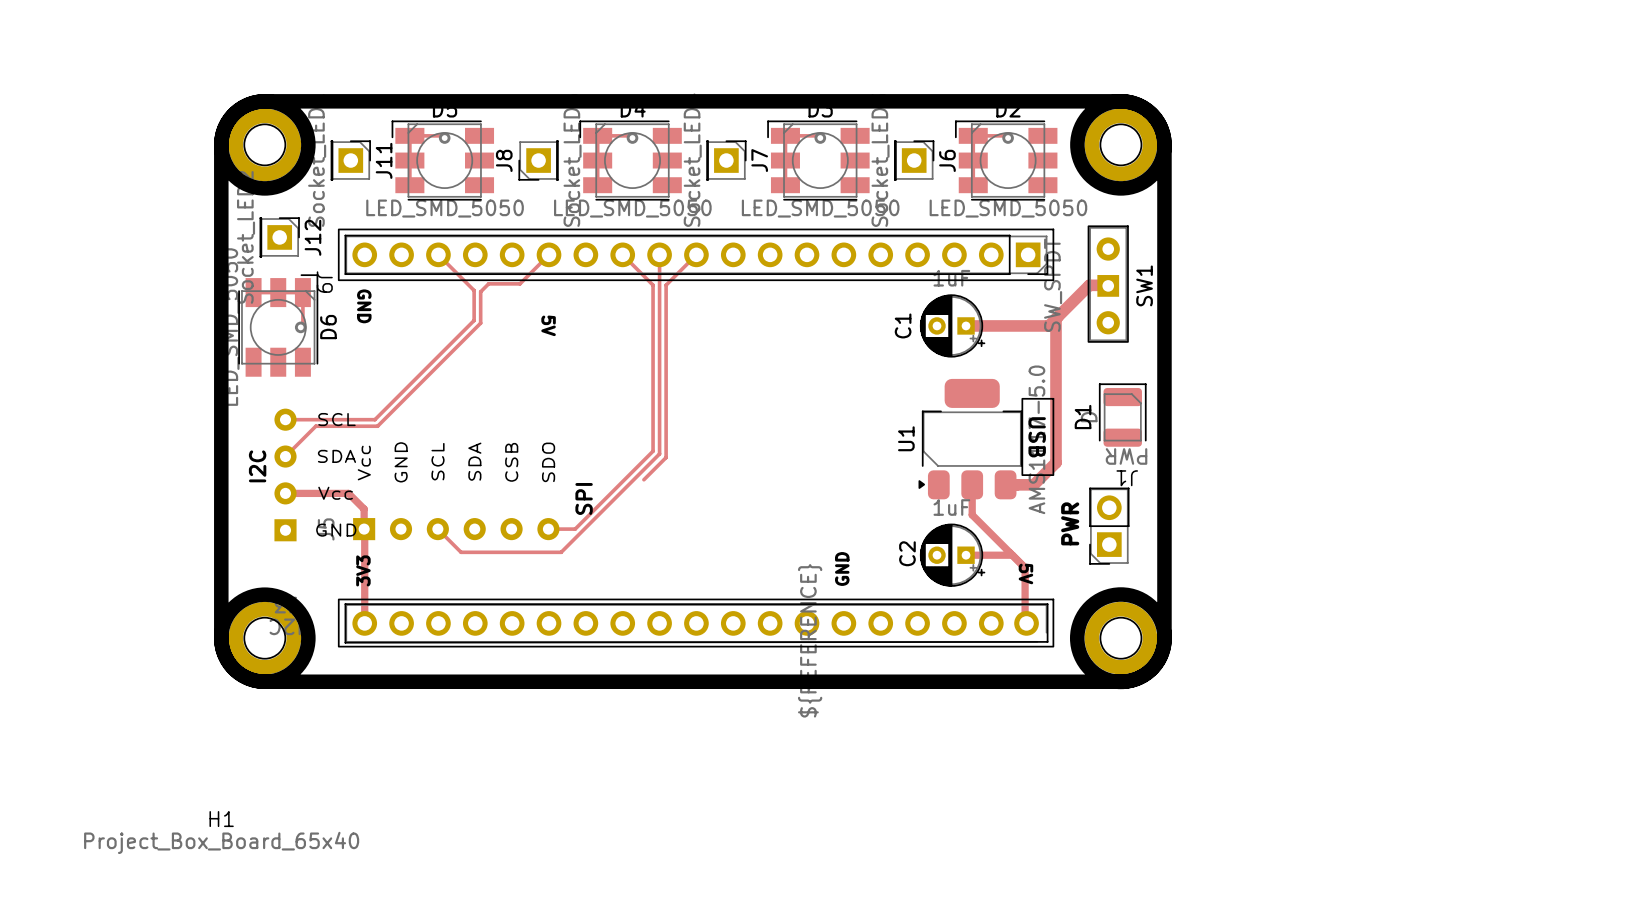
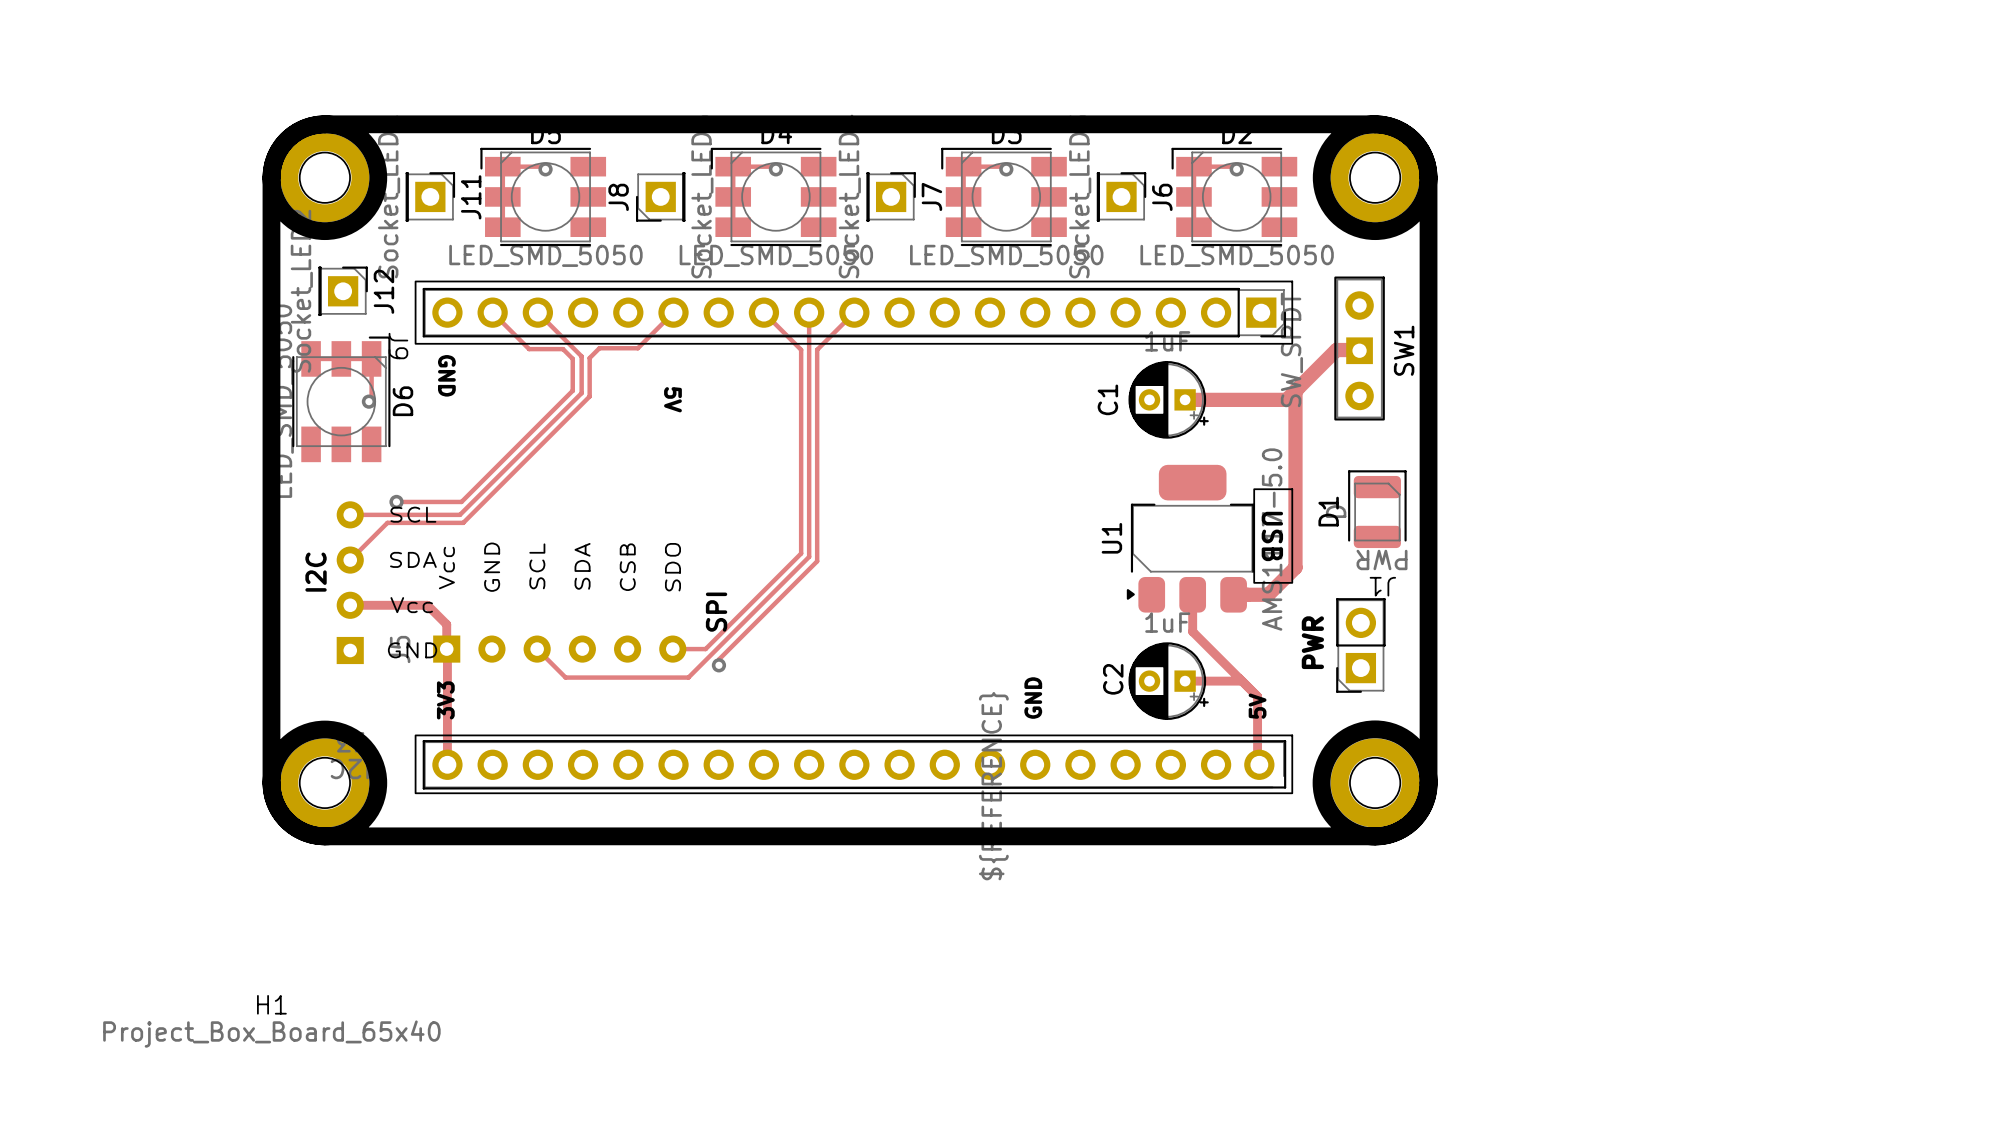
track: none -> (492, 312) (529, 349) (563, 349) (572, 358) (572, 390) (461, 501) (396, 501)
via: none -> (396, 501)
track: none -> (789, 588) (718, 659) (718, 665)
via: none -> (718, 665)
J9 text rotation: 0° (1025, 573) -> 180° (1257, 706)

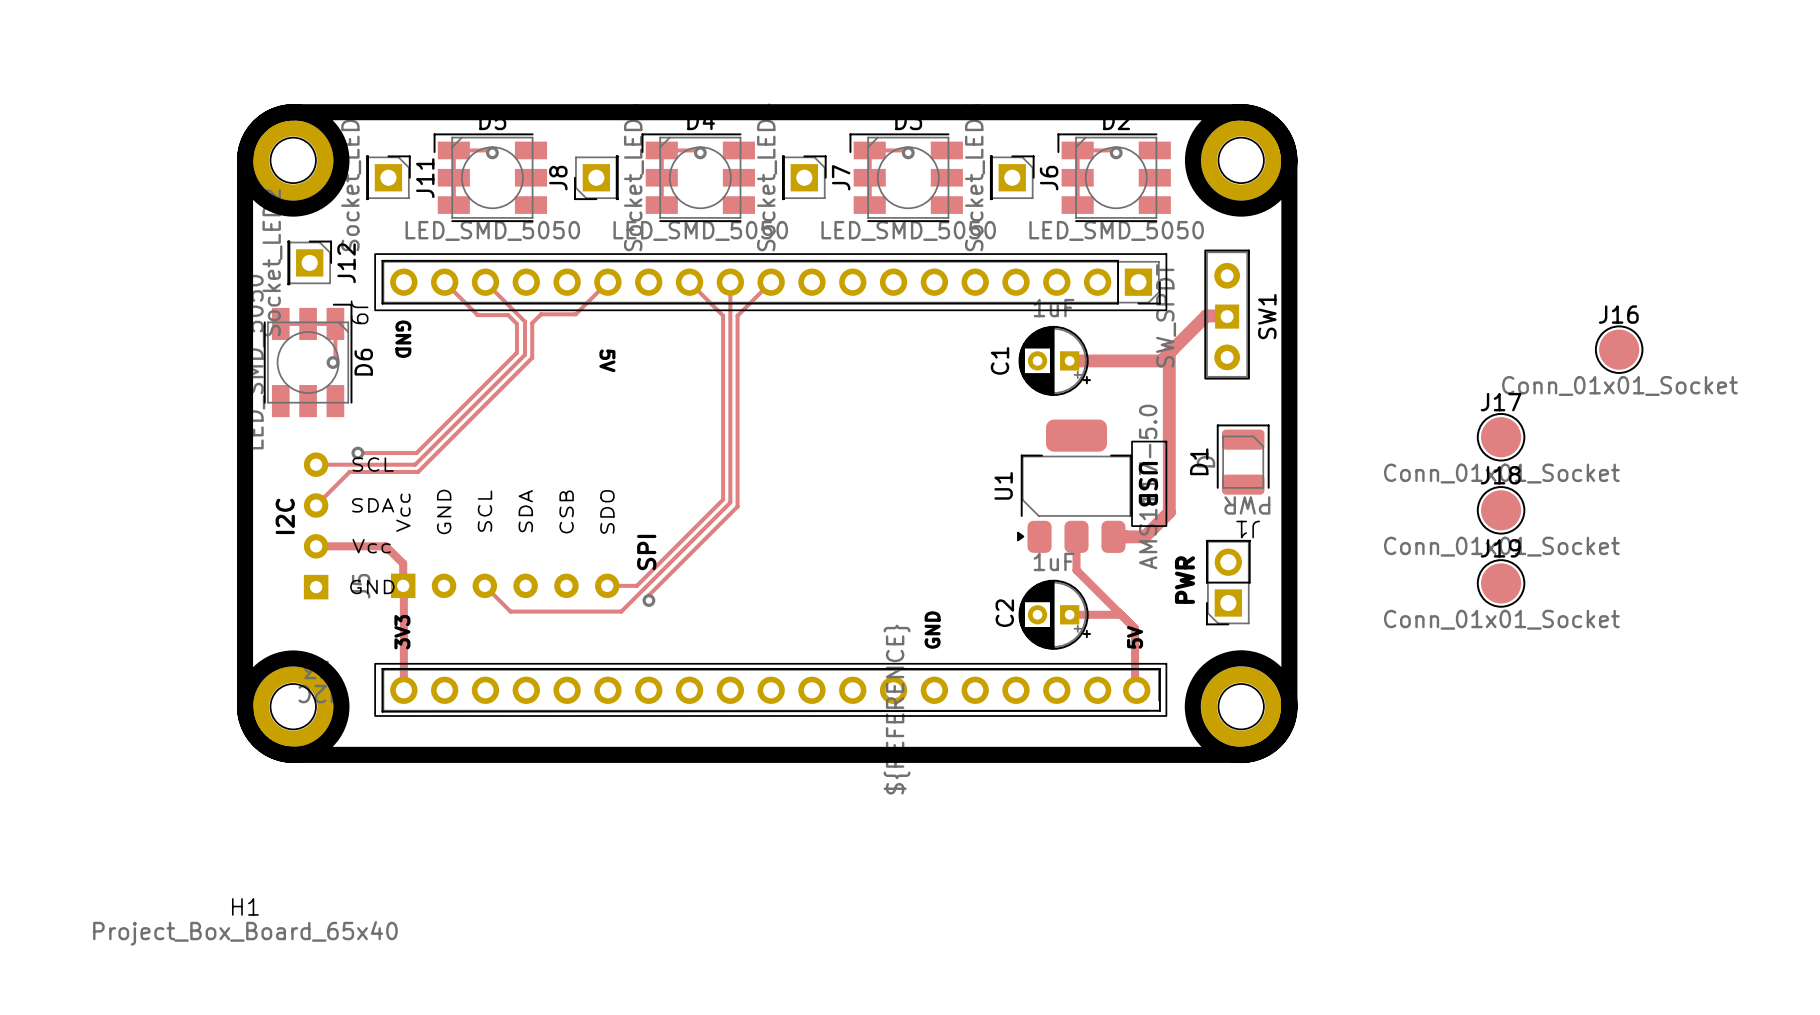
J16: none -> Conn_01x01_Socket (1619, 349)
J17: none -> Conn_01x01_Socket (1501, 437)
J18: none -> Conn_01x01_Socket (1501, 510)
J19: none -> Conn_01x01_Socket (1501, 583)

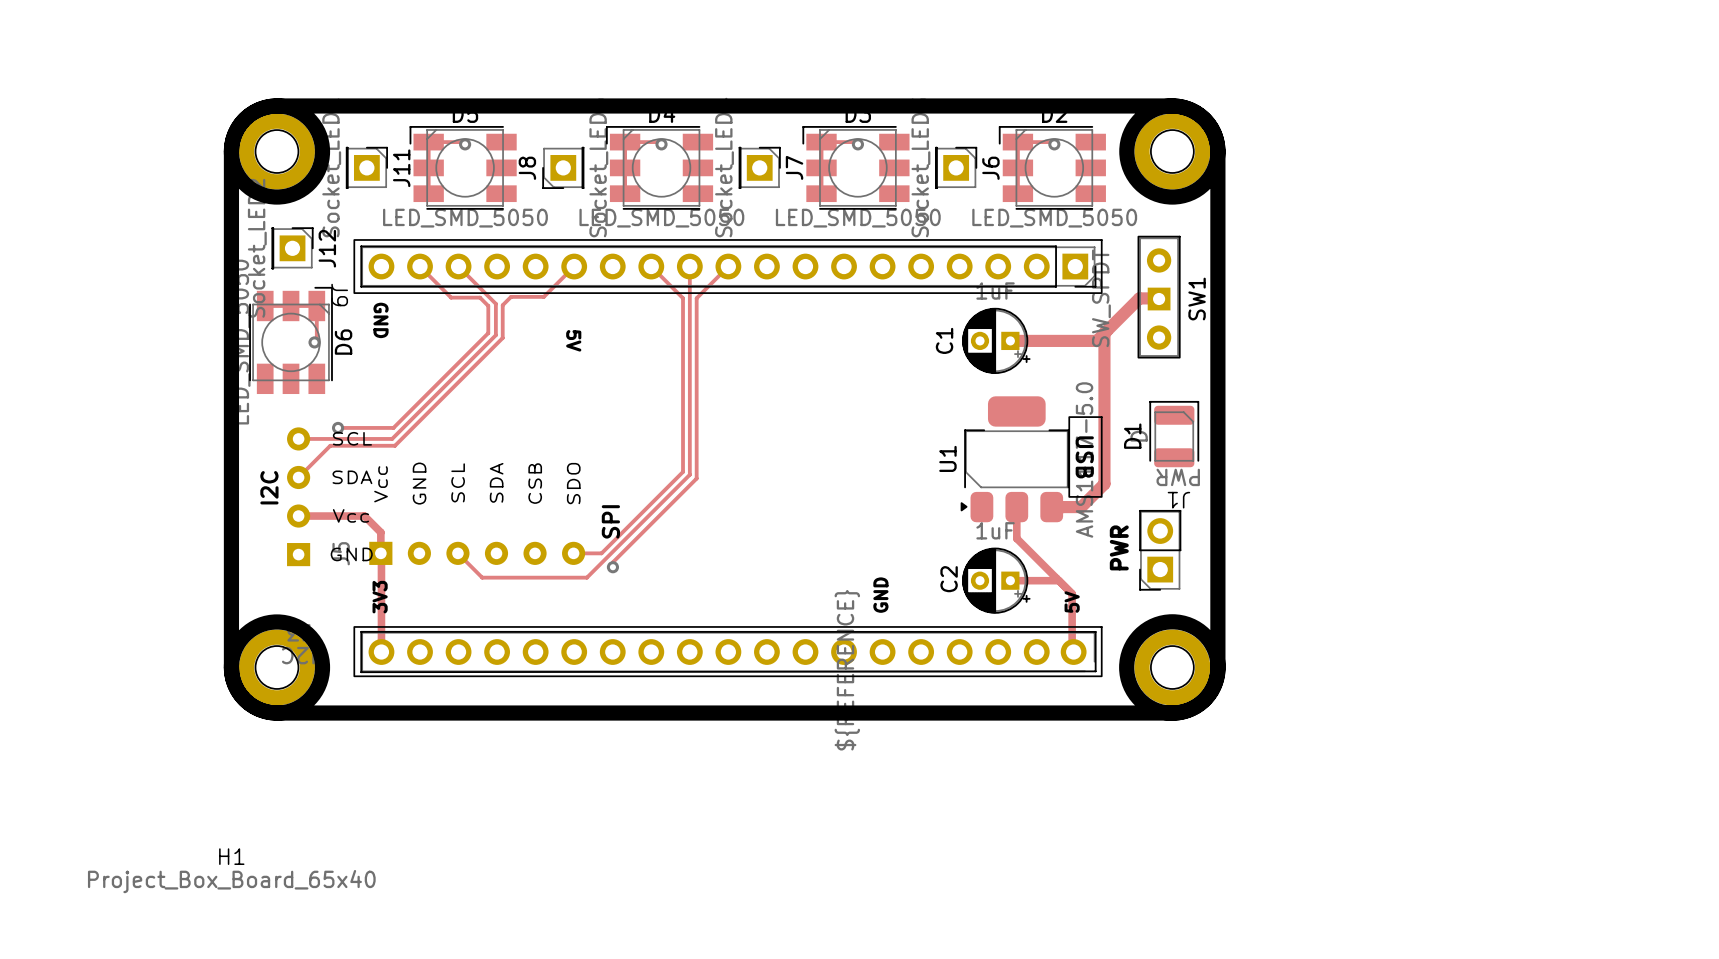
J16: Conn_01x01_Socket (1619, 349) -> none
J17: Conn_01x01_Socket (1501, 437) -> none
J18: Conn_01x01_Socket (1501, 510) -> none
J19: Conn_01x01_Socket (1501, 583) -> none

